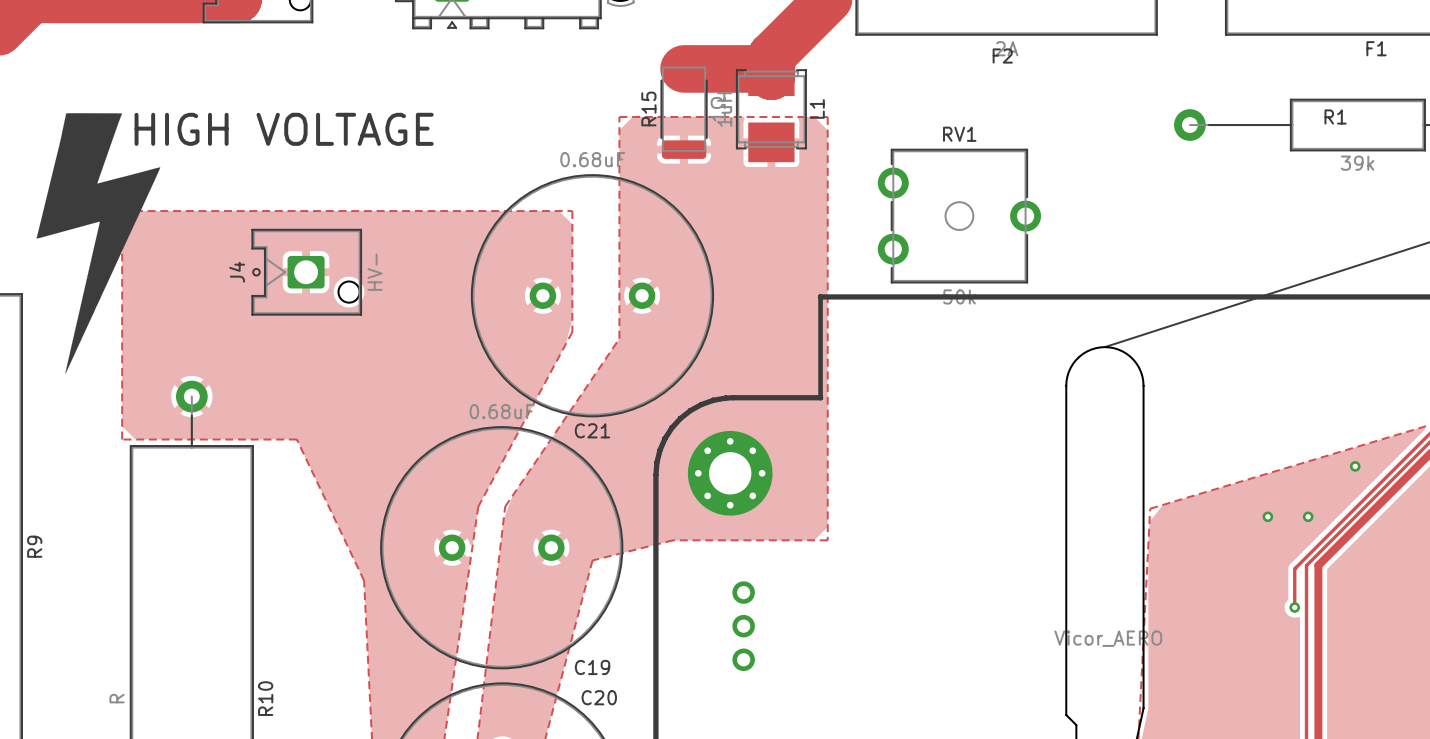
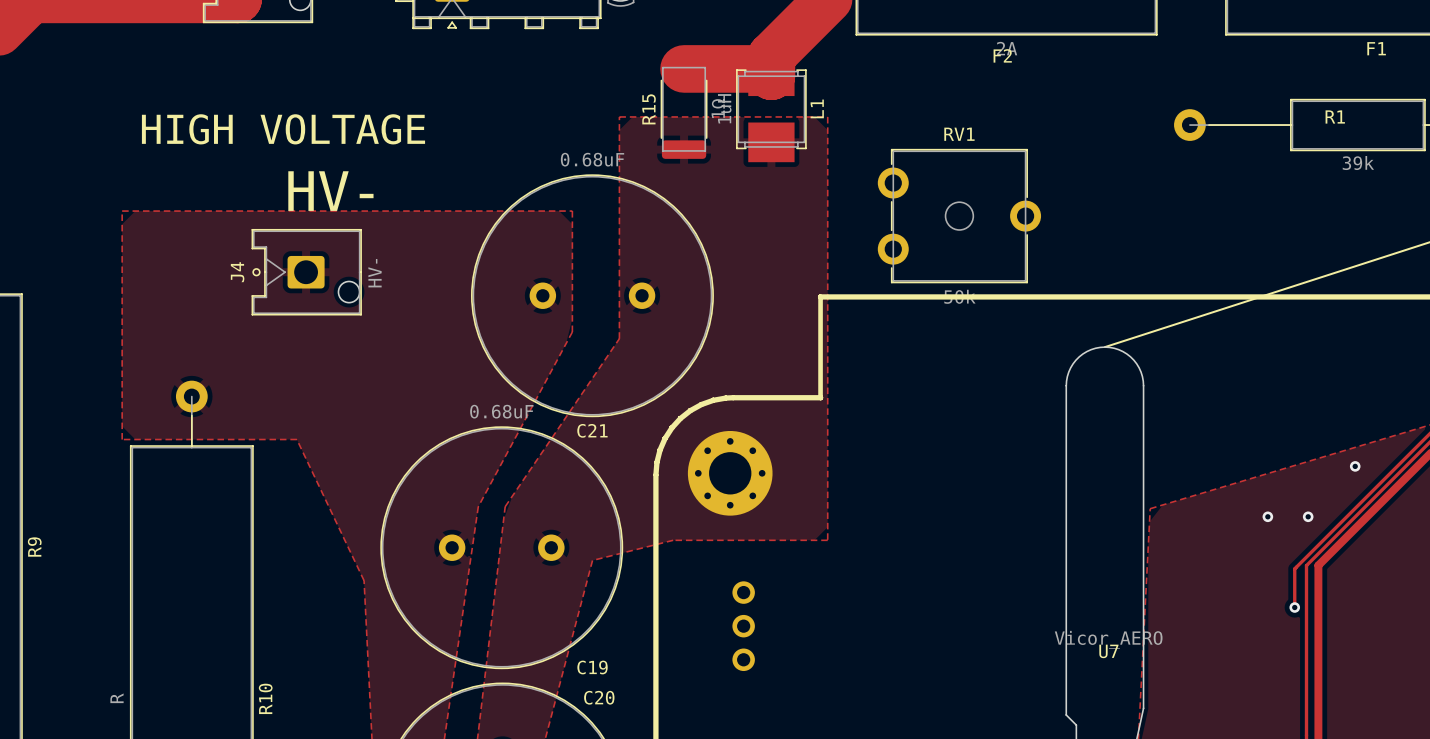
drawing: [36, 113, 161, 374] -> none
text: none -> HV- (330, 191)
U7 name: none -> U7 (1108, 651)

